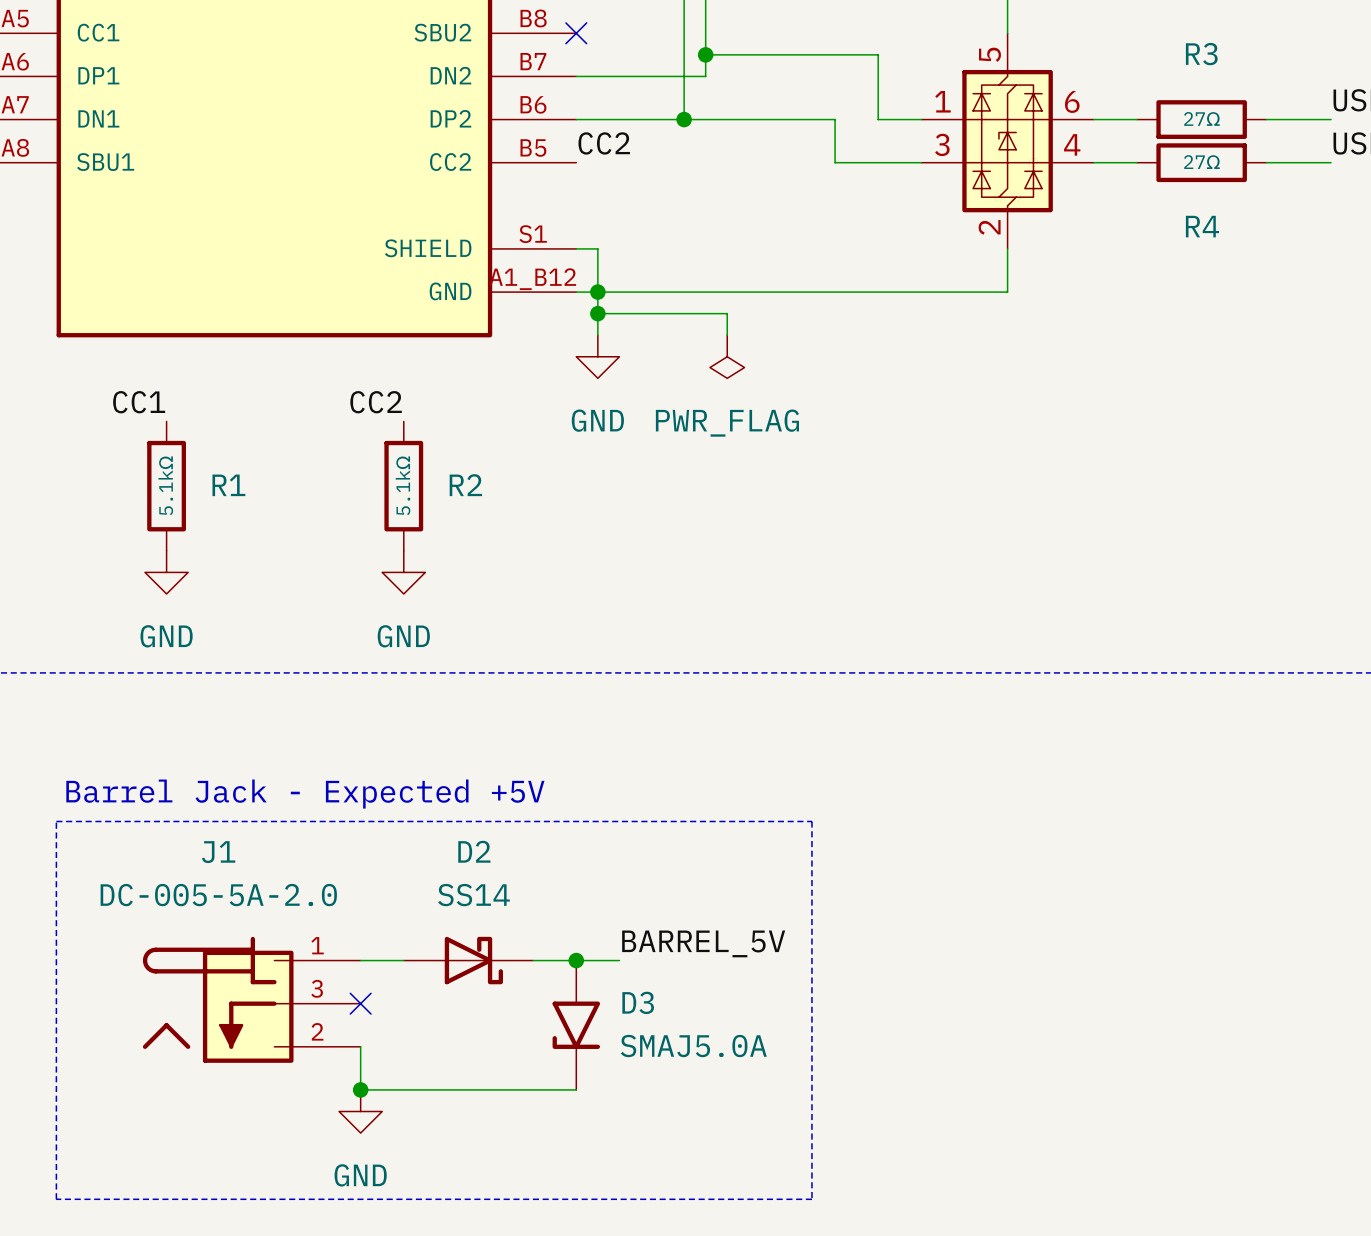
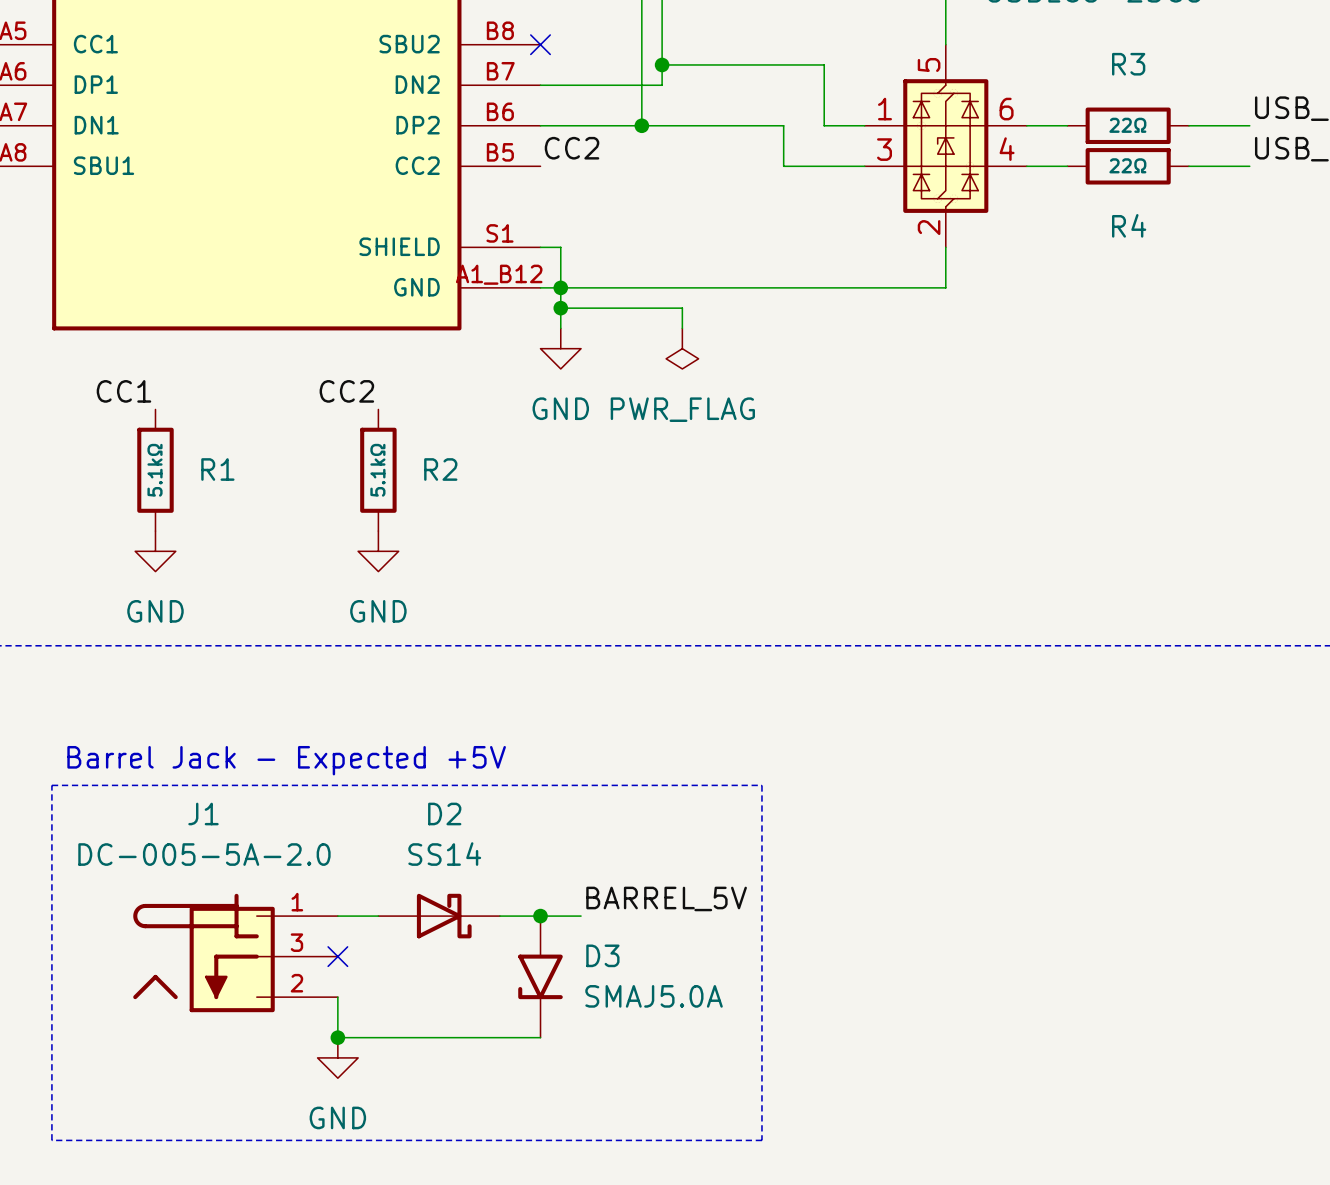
R3 value: 27Ω (1201, 118) -> 22Ω (1127, 125)
R4 value: 27Ω (1201, 162) -> 22Ω (1127, 165)

